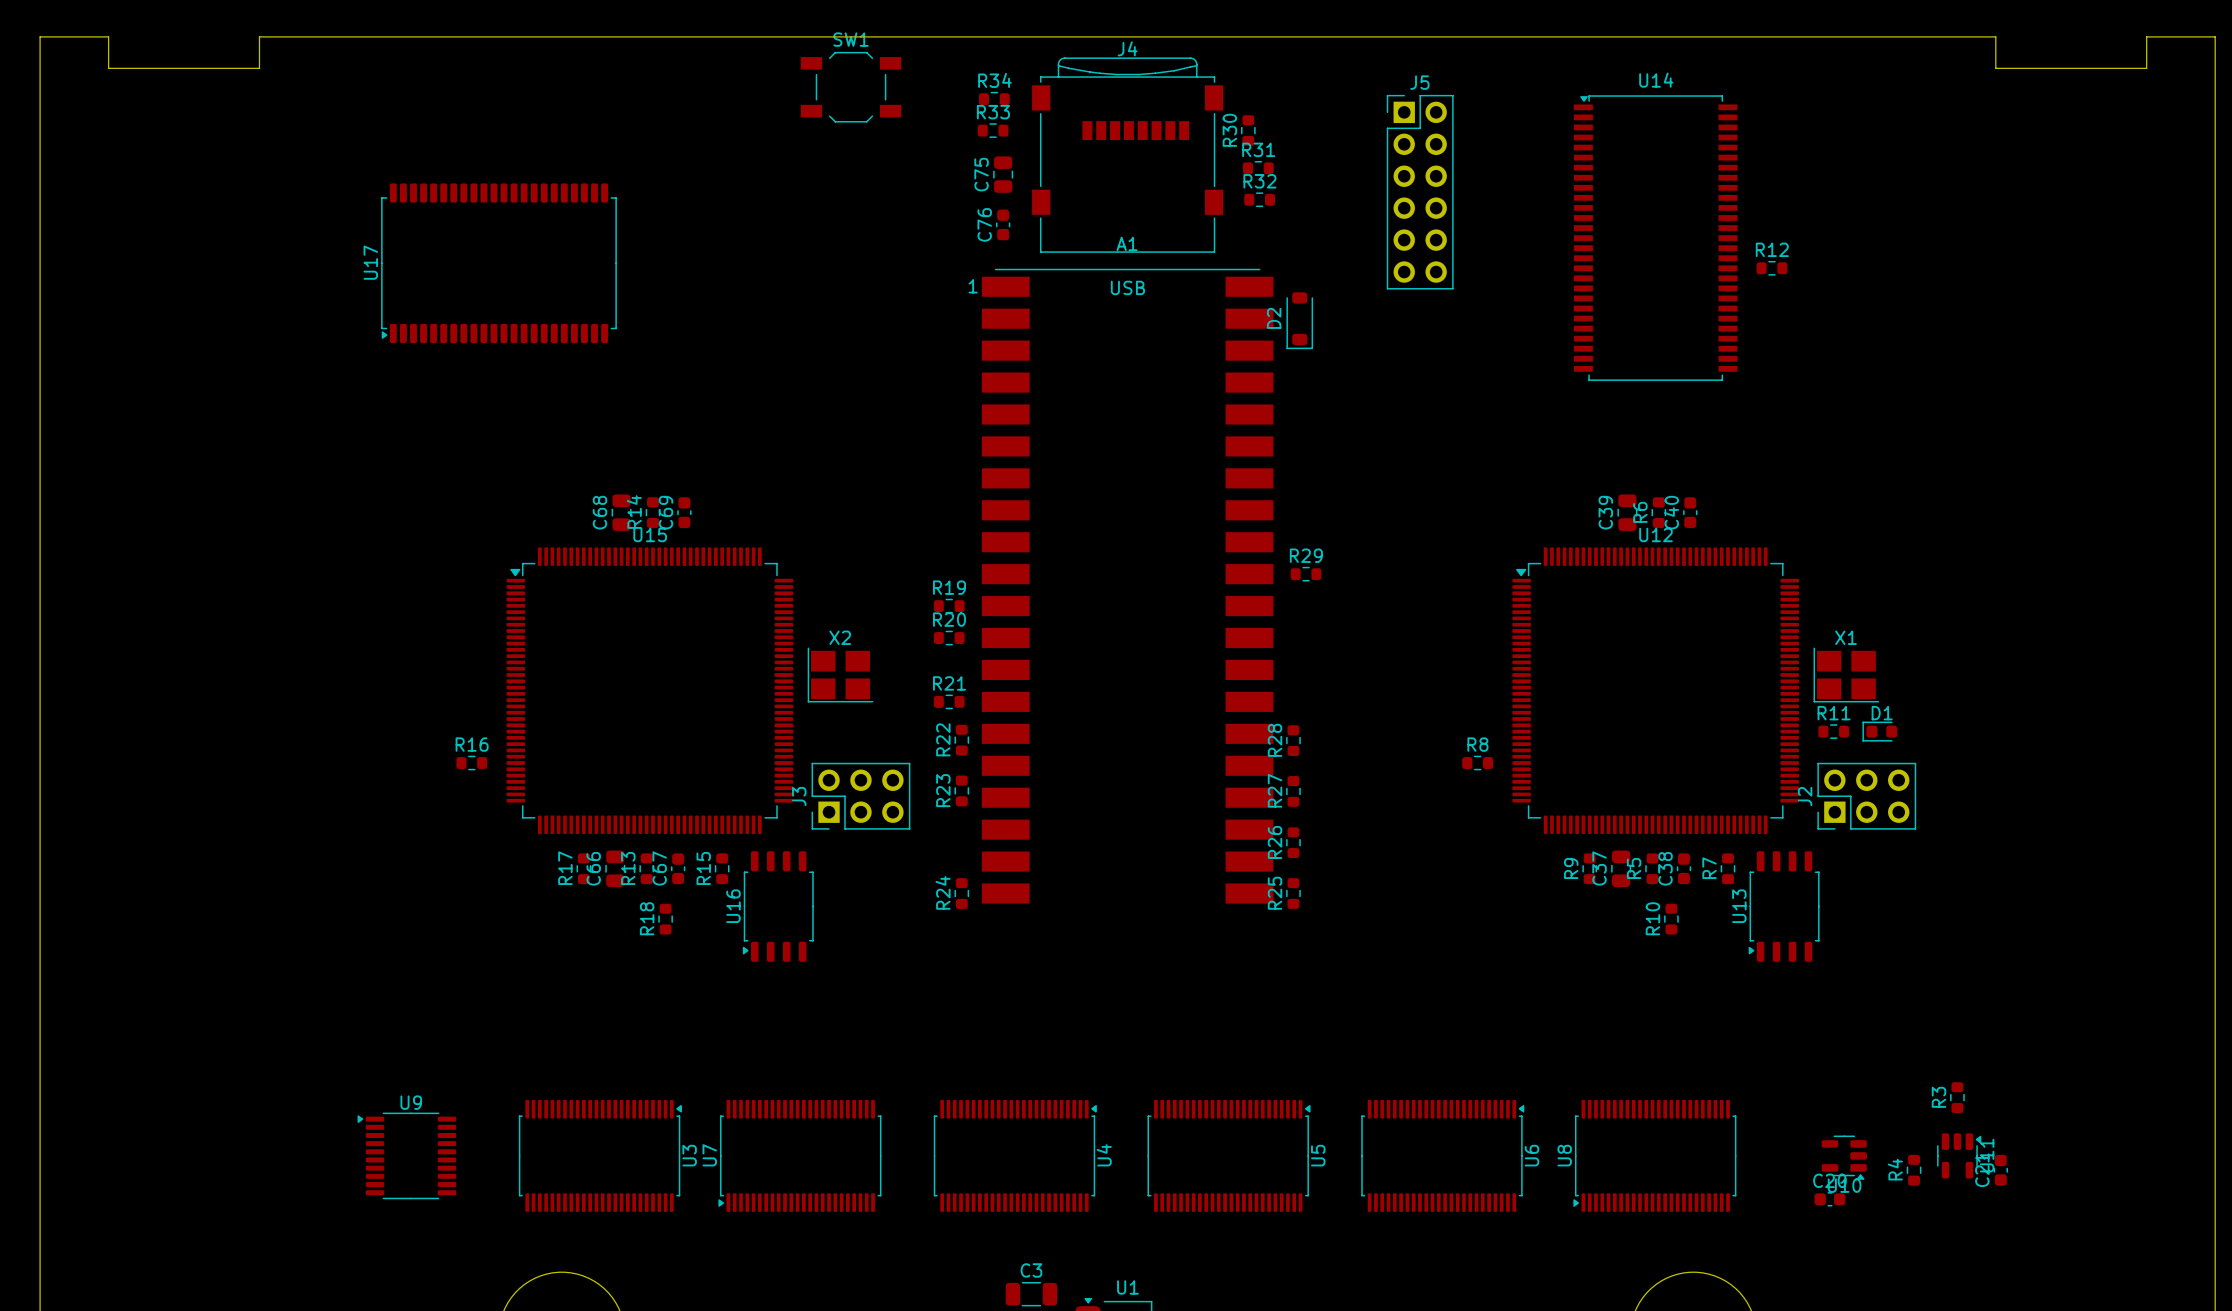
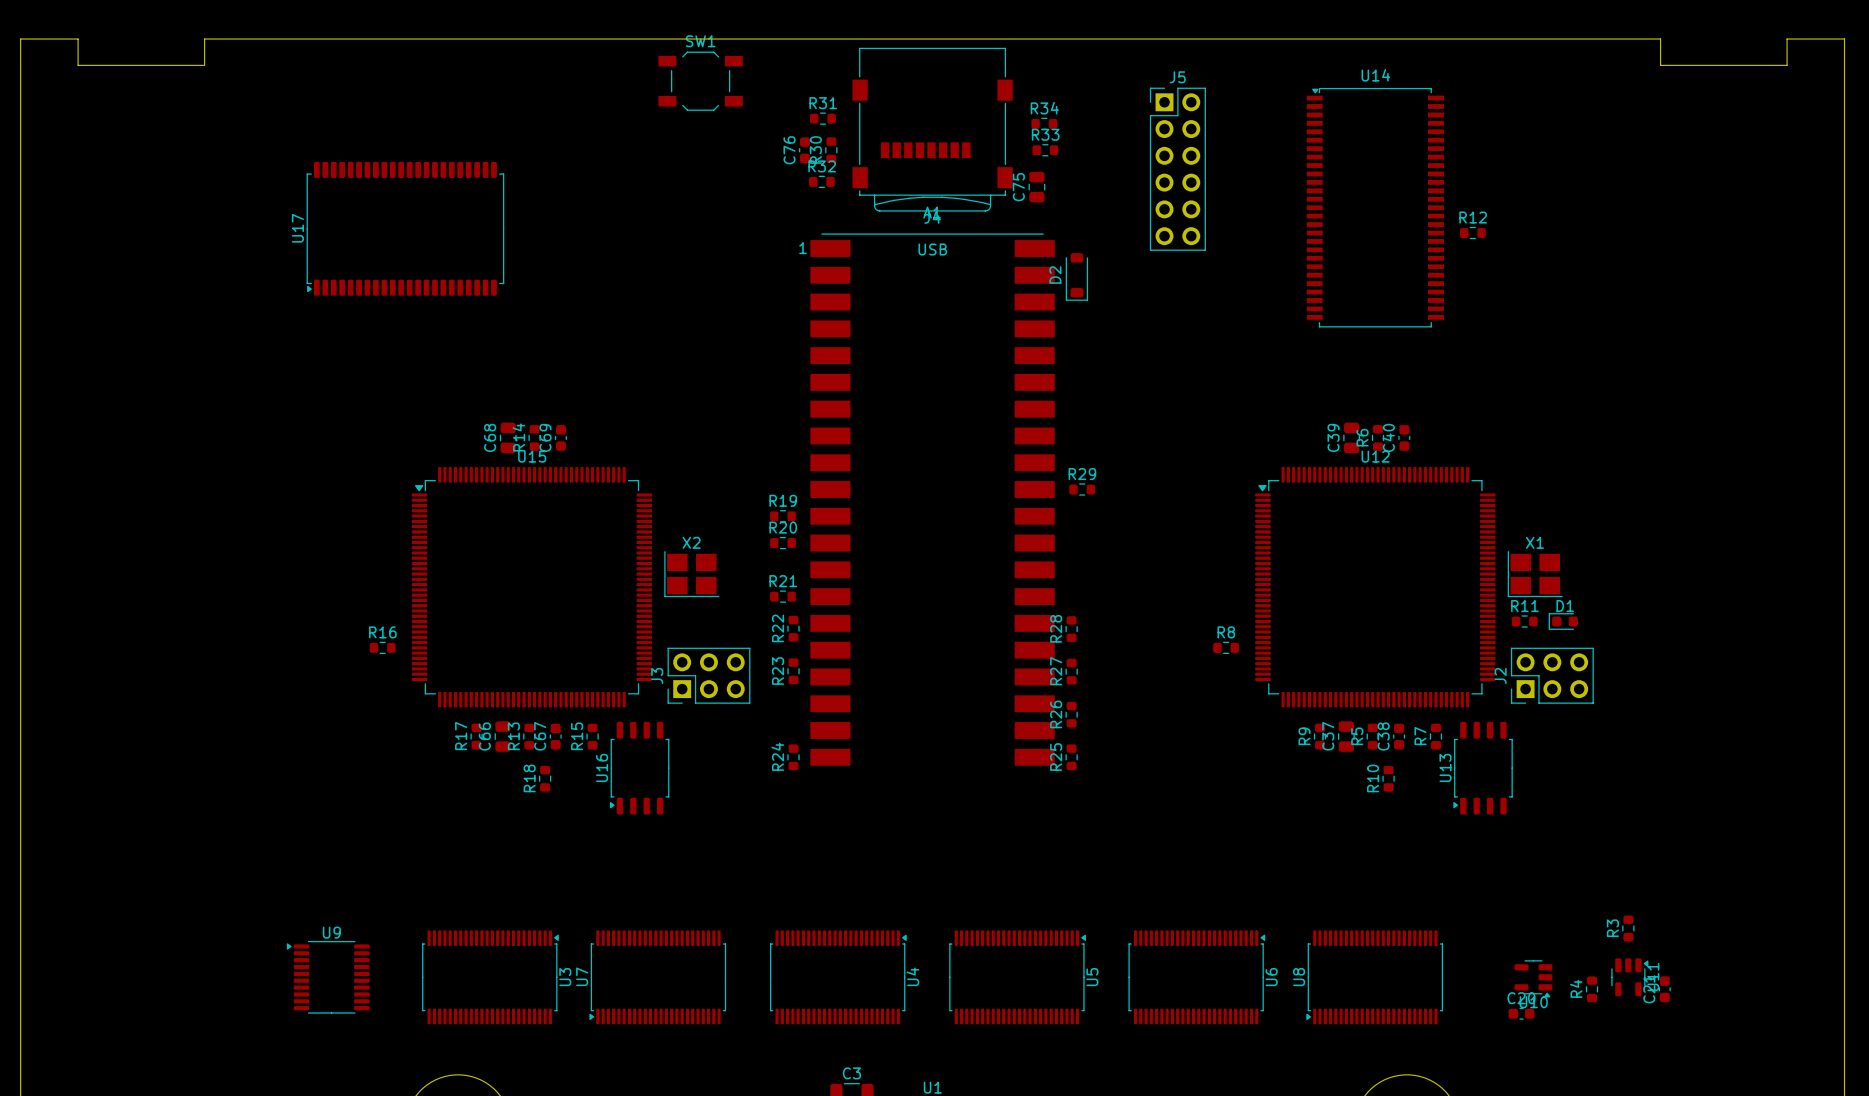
R34 position: (994, 99) -> (1044, 123)
R33 position: (993, 130) -> (1045, 150)
R30 position: (1248, 130) -> (831, 150)
J4 rotation: 0° (1127, 155) -> 180° (932, 129)
R31 position: (1258, 168) -> (822, 118)
C75 position: (1003, 174) -> (1036, 187)
R32 position: (1259, 199) -> (821, 181)
C76 position: (1003, 224) -> (805, 150)

